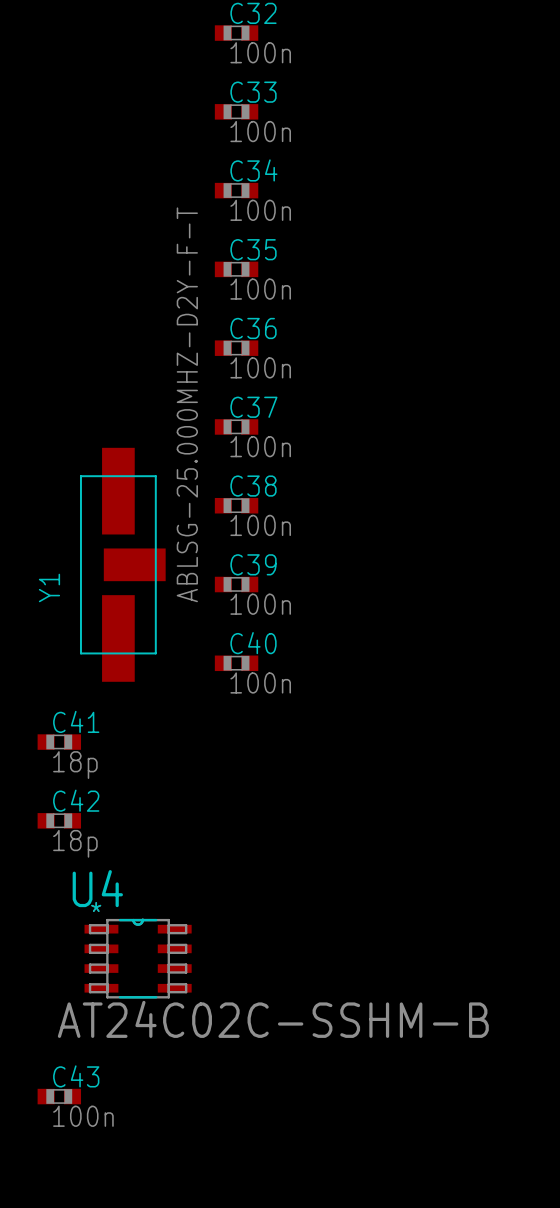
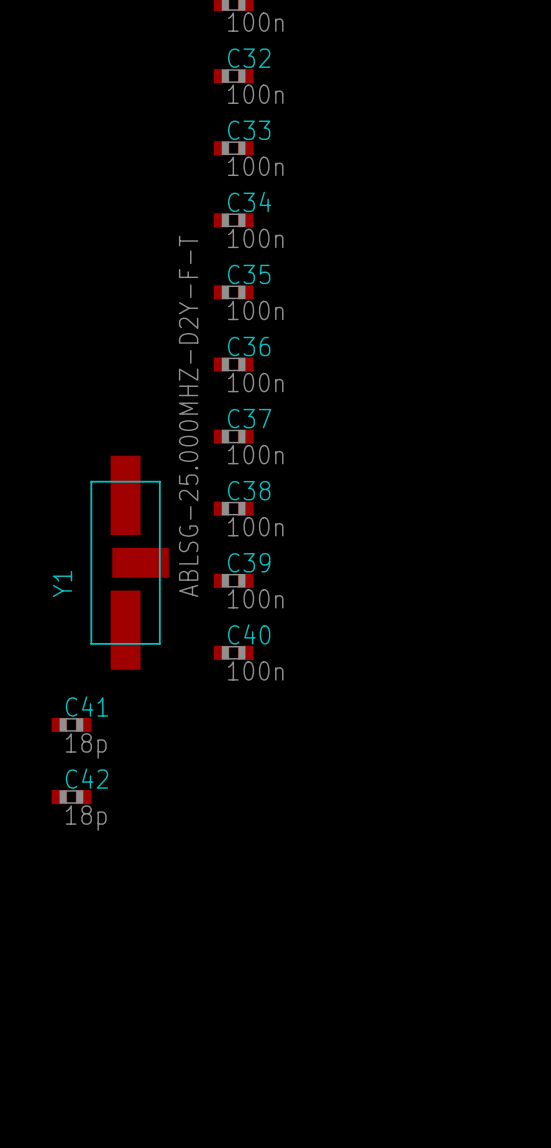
U4: AT24C02C-SSHM-B (138, 958) -> none
C43: 100n (59, 1096) -> none

